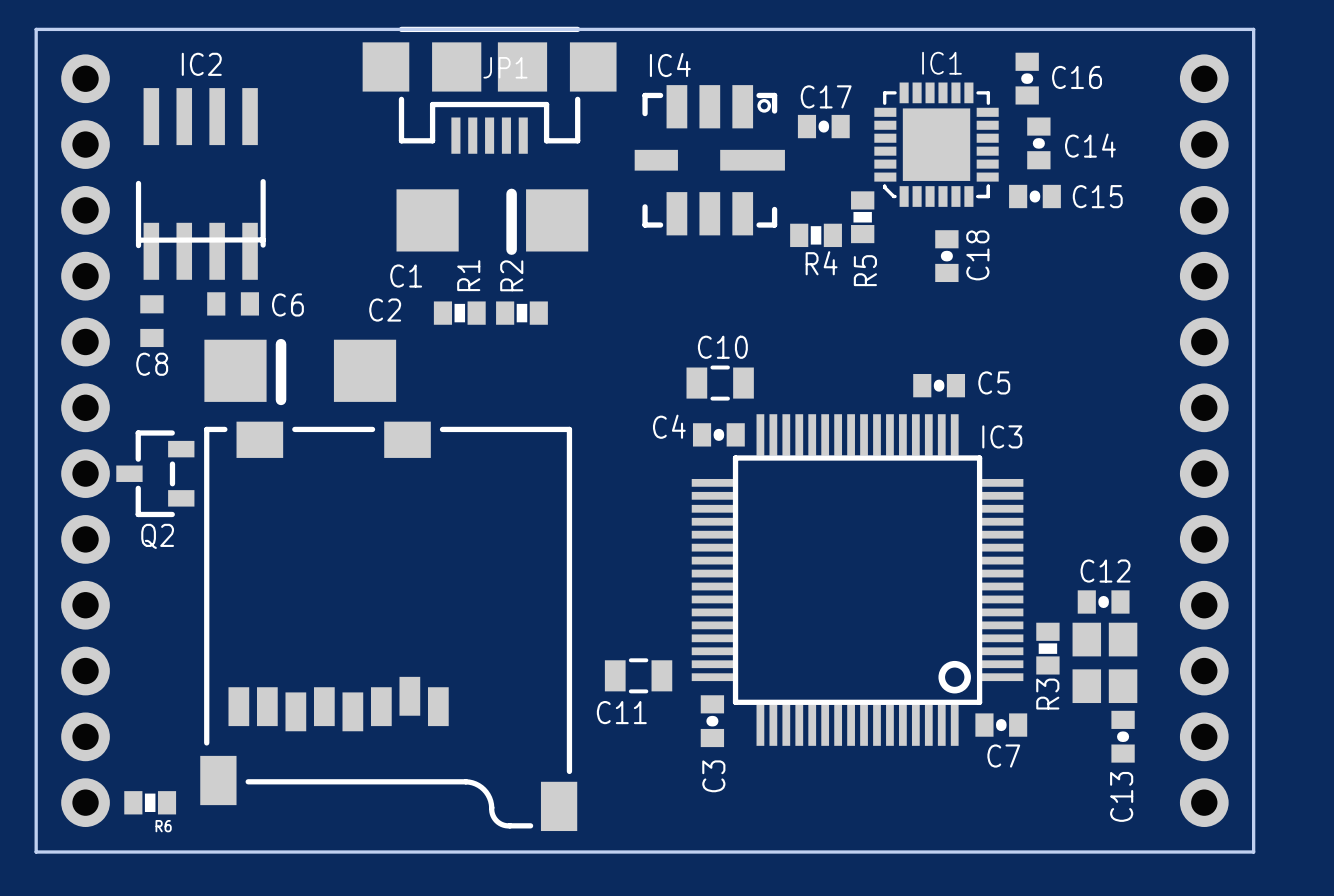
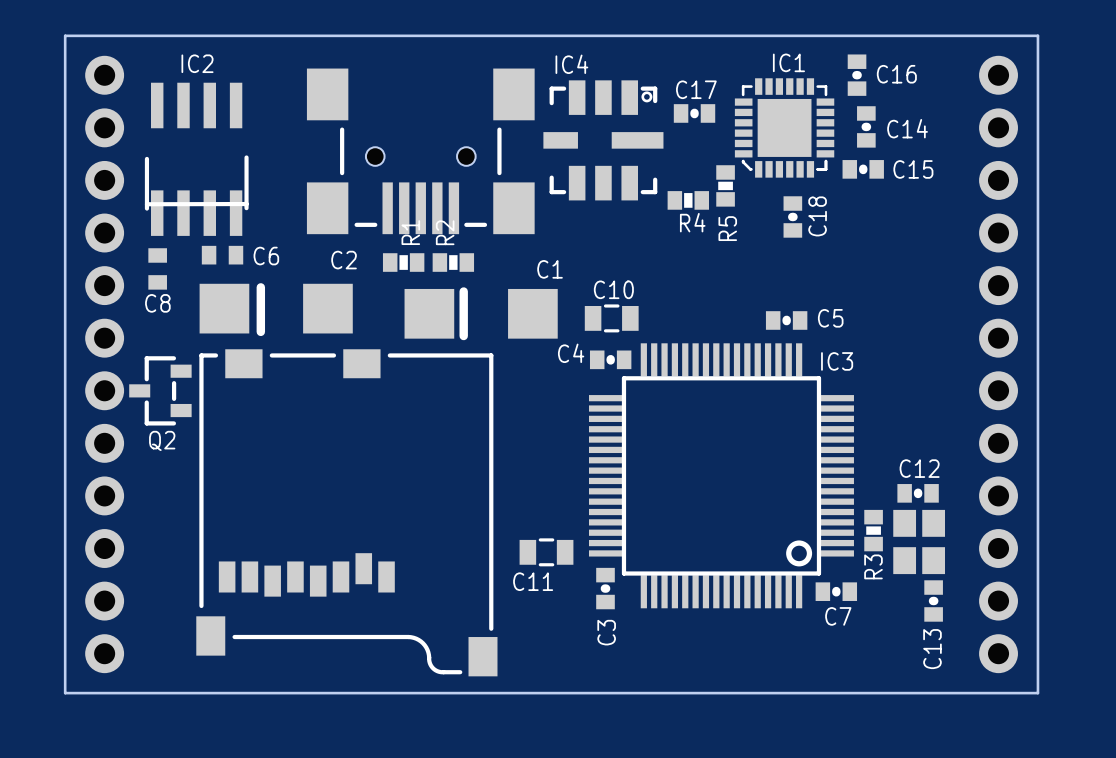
part: (489, 90) -> none
part: none -> (420, 151)
line: (511, 193) (511, 249) -> (463, 291) (463, 336)
C1 position: (492, 220) -> (481, 313)
C1 name position: C1 (406, 276) -> C1 (550, 269)
R6: (150, 802) -> none

